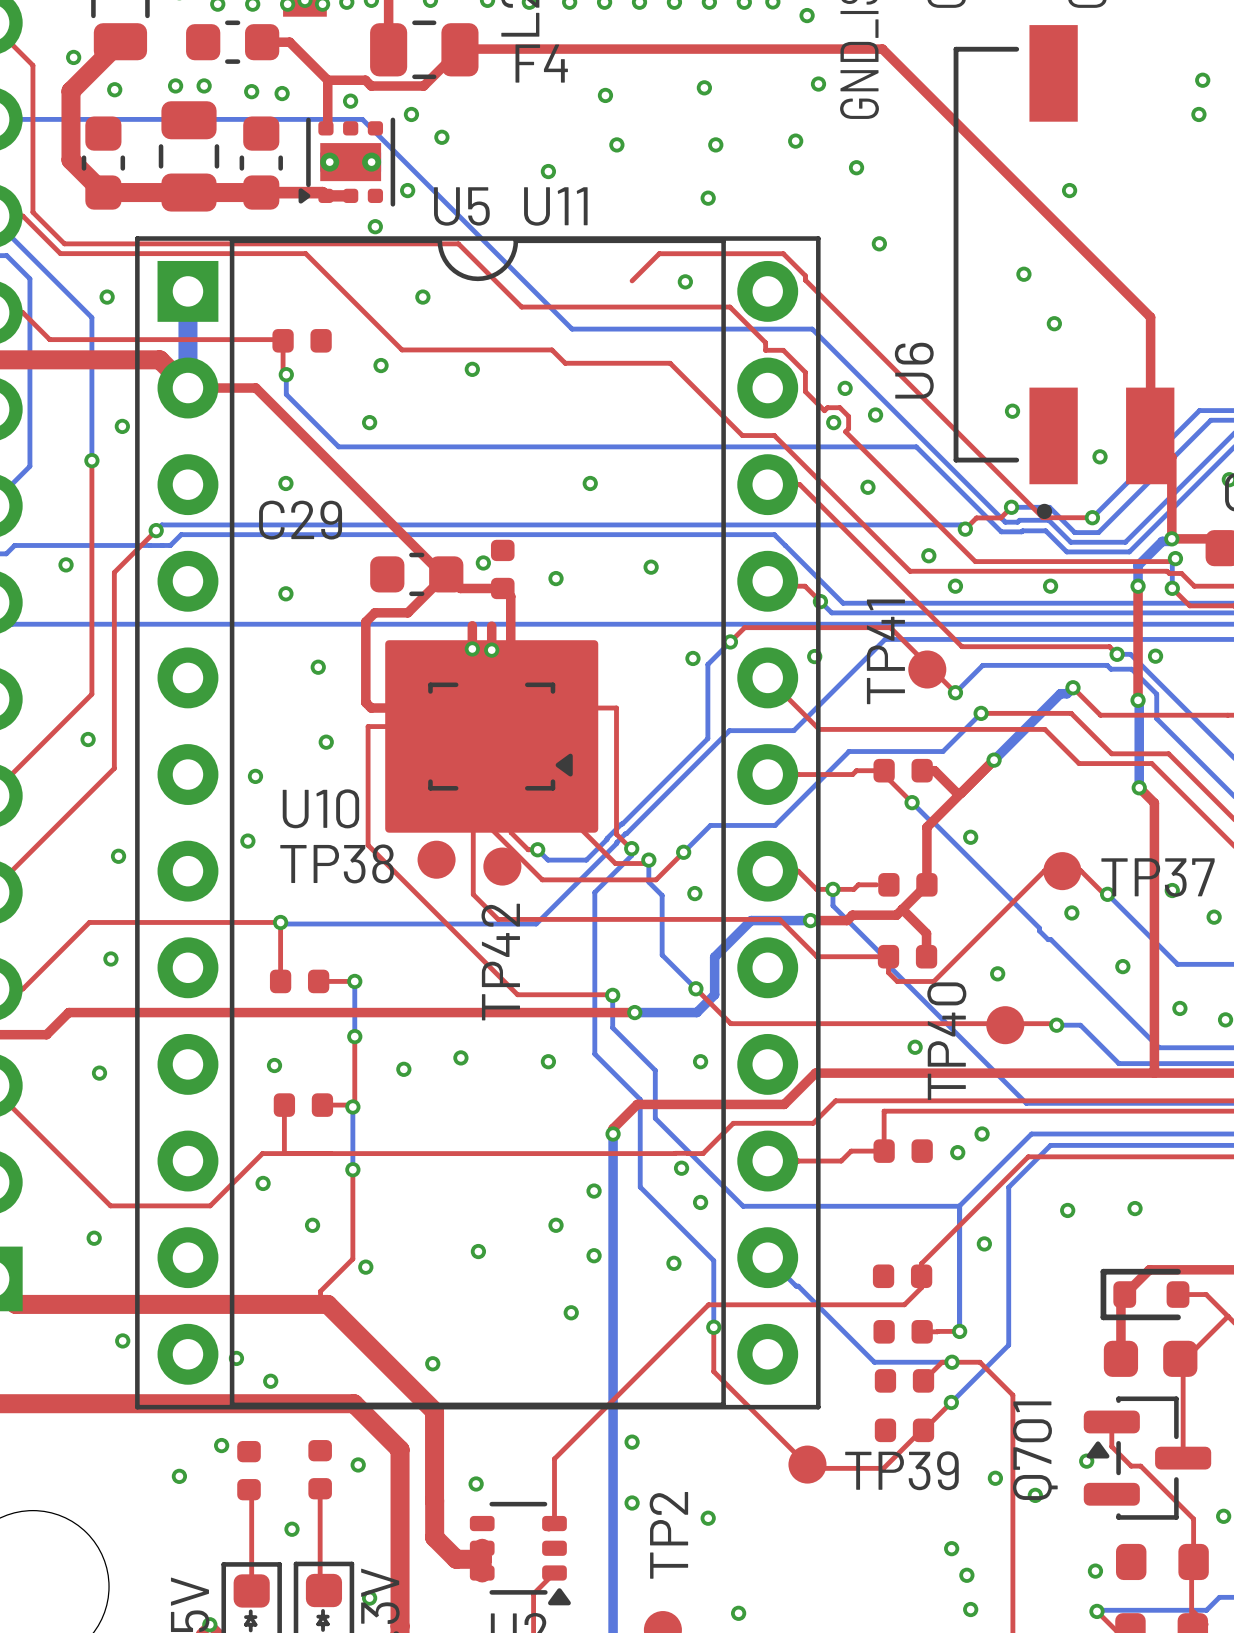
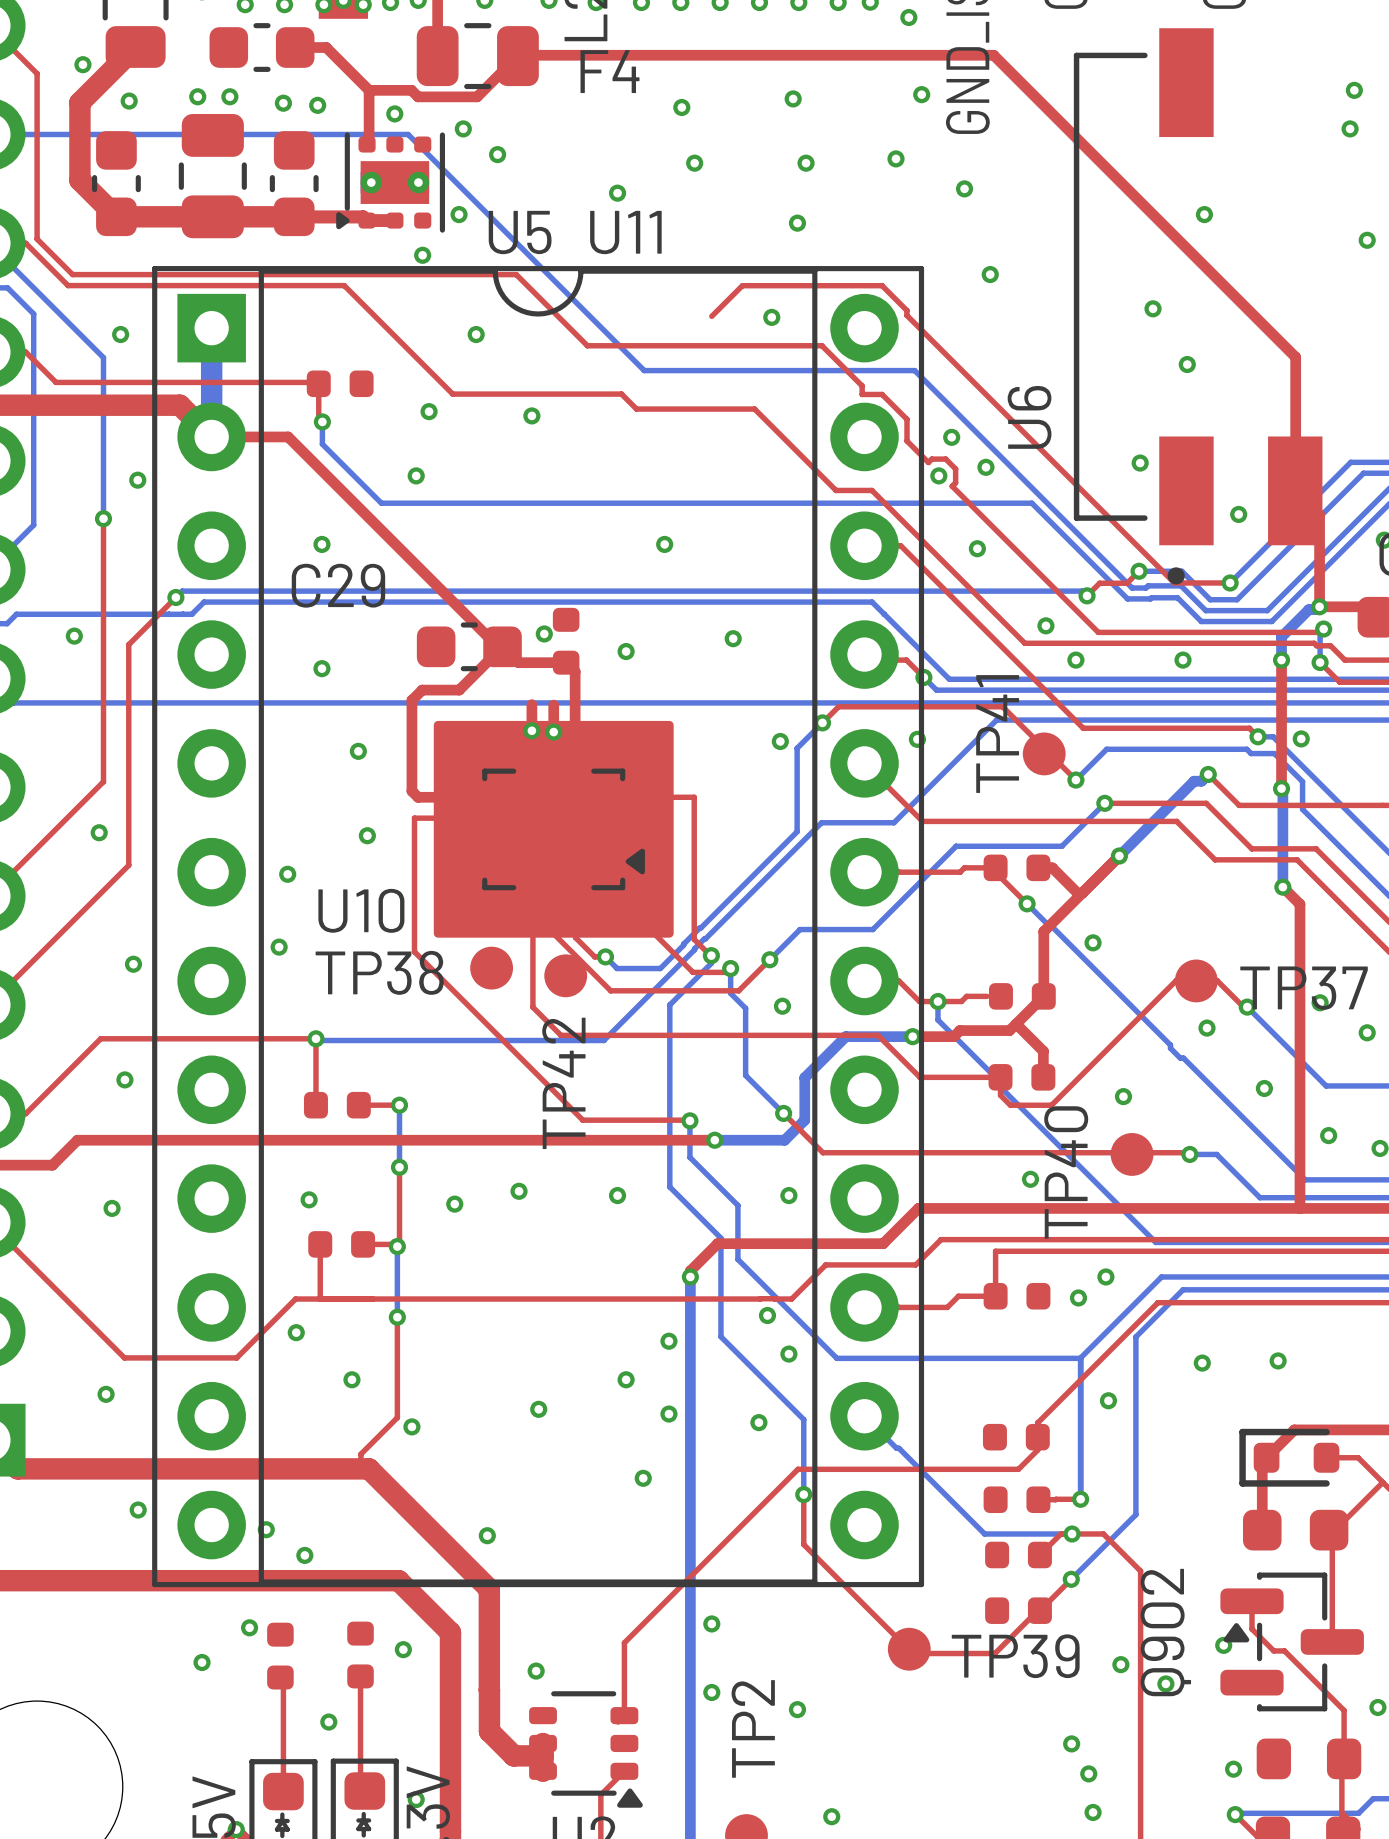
via: none -> (1367, 240)
Q701 name: Q701 (1035, 1450) -> Q902 (1165, 1632)

